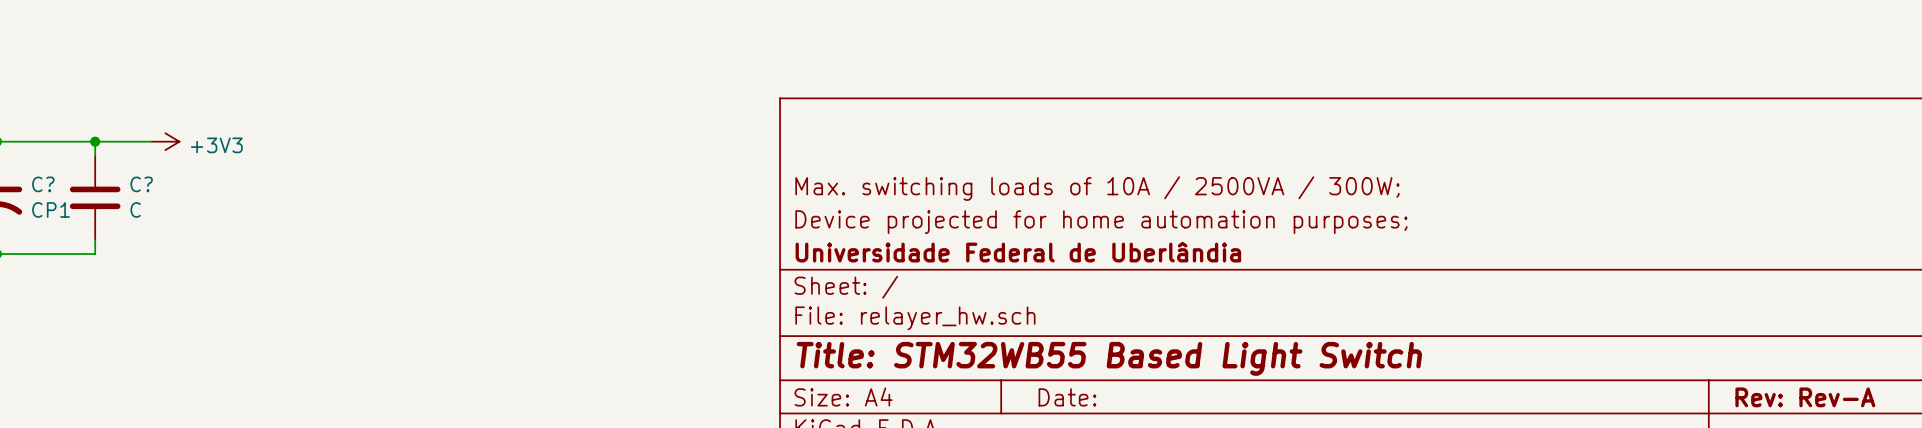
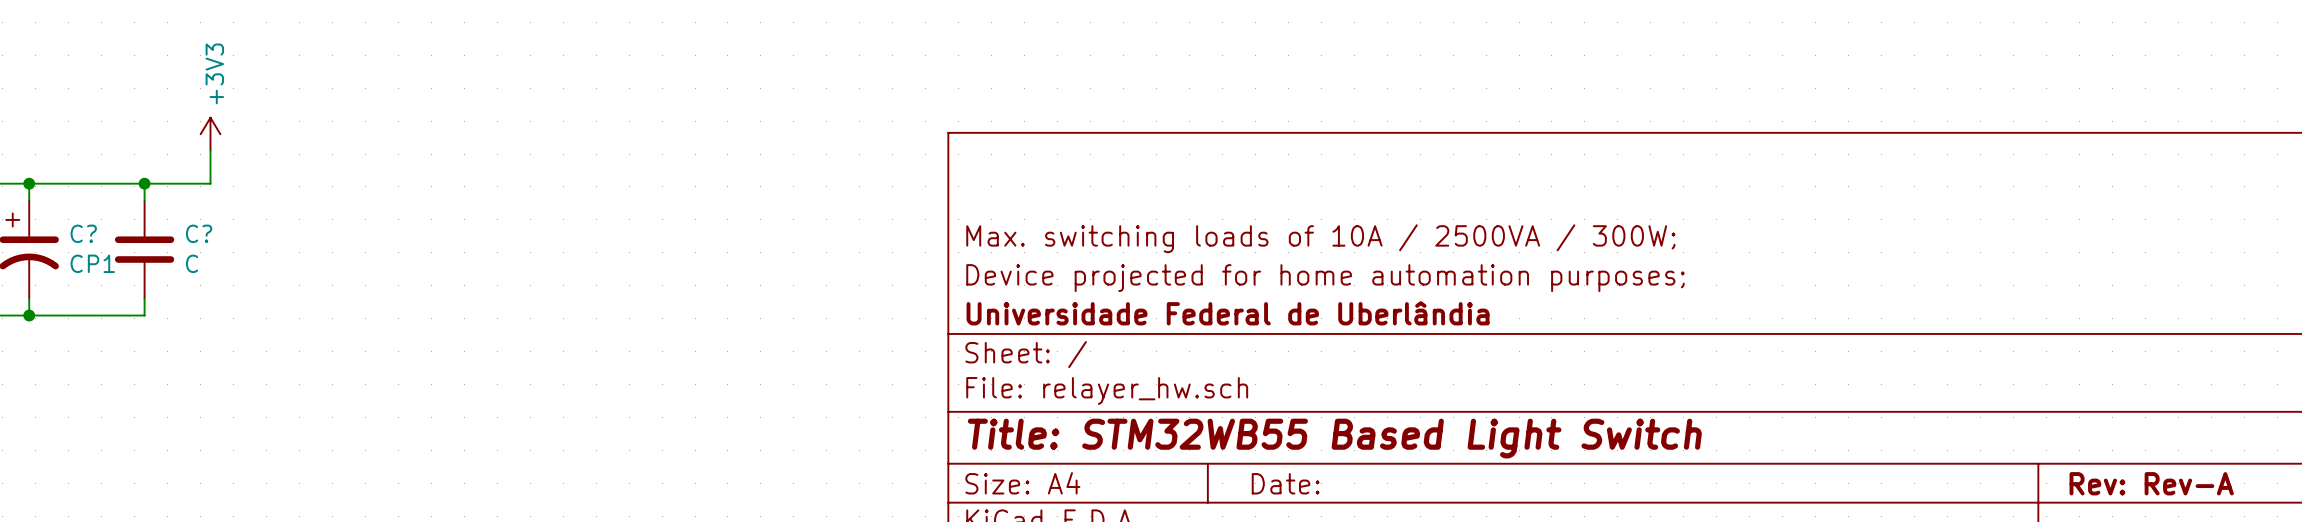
wire: none -> (210, 150) (210, 183)
power symbol rotation: 0° (165, 141) -> 90° counterclockwise (210, 134)
power symbol position: +3V3 (165, 141) -> +3V3 (210, 134)

